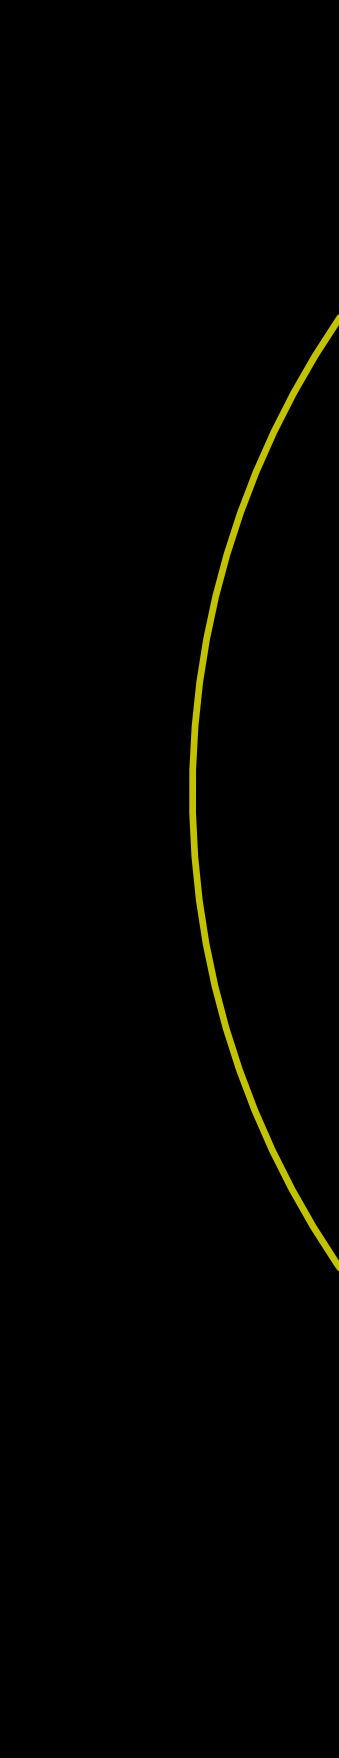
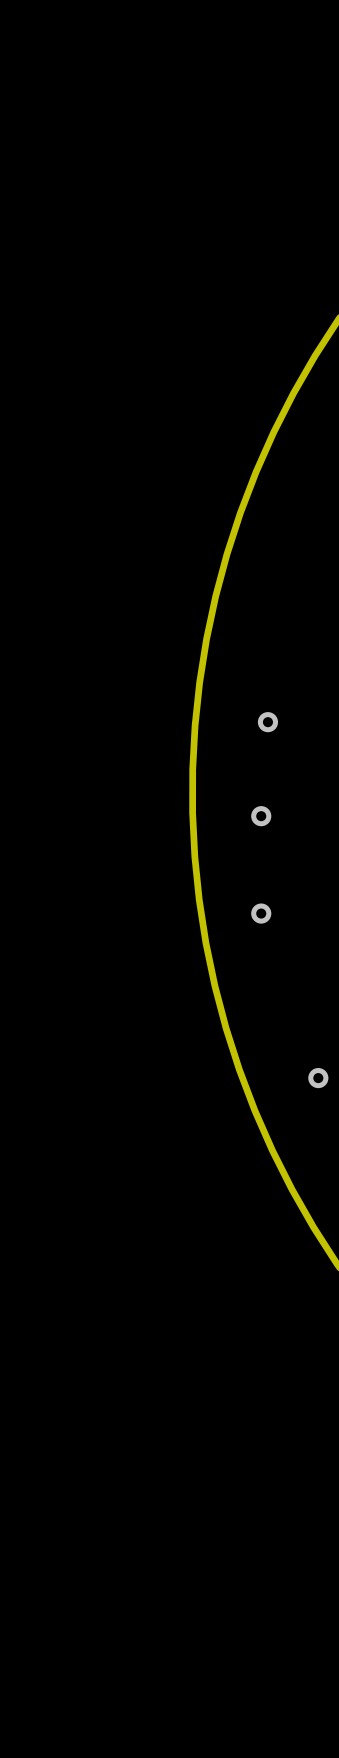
via: none -> (267, 722)
via: none -> (261, 816)
via: none -> (261, 913)
via: none -> (318, 1078)

